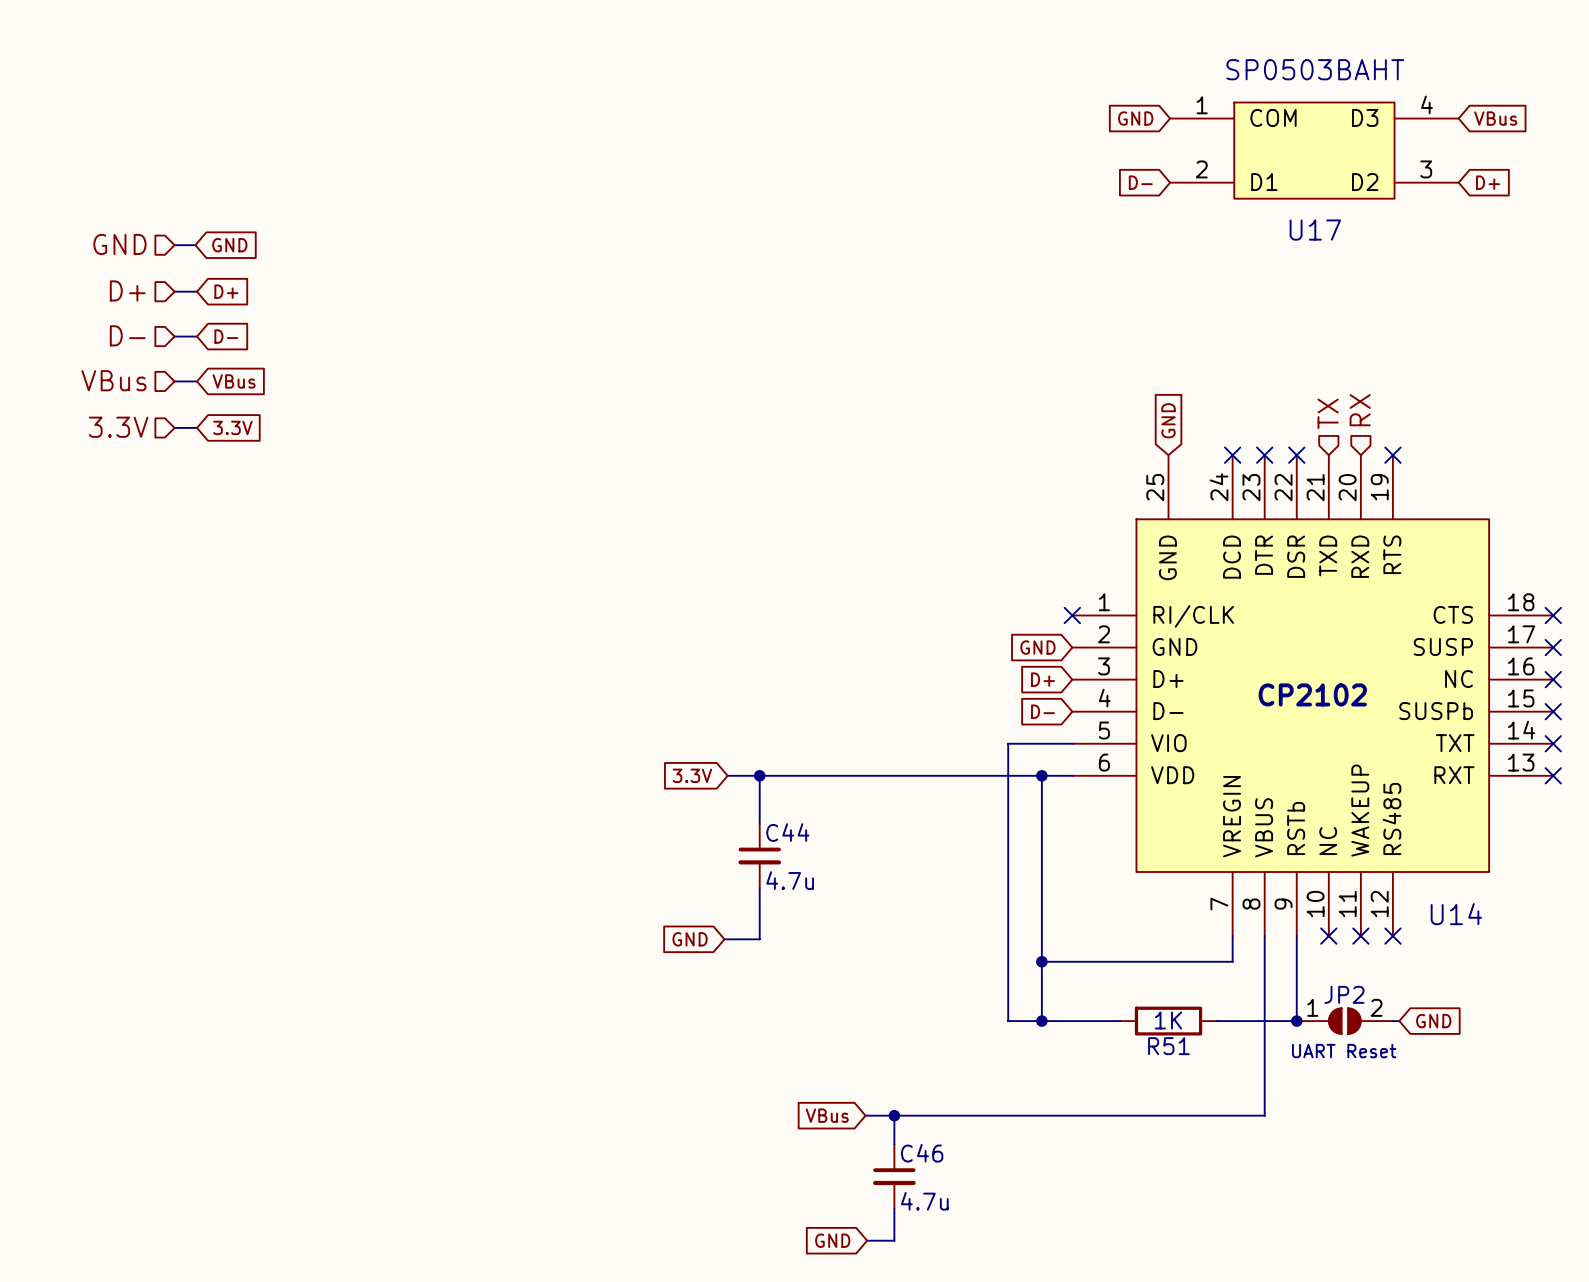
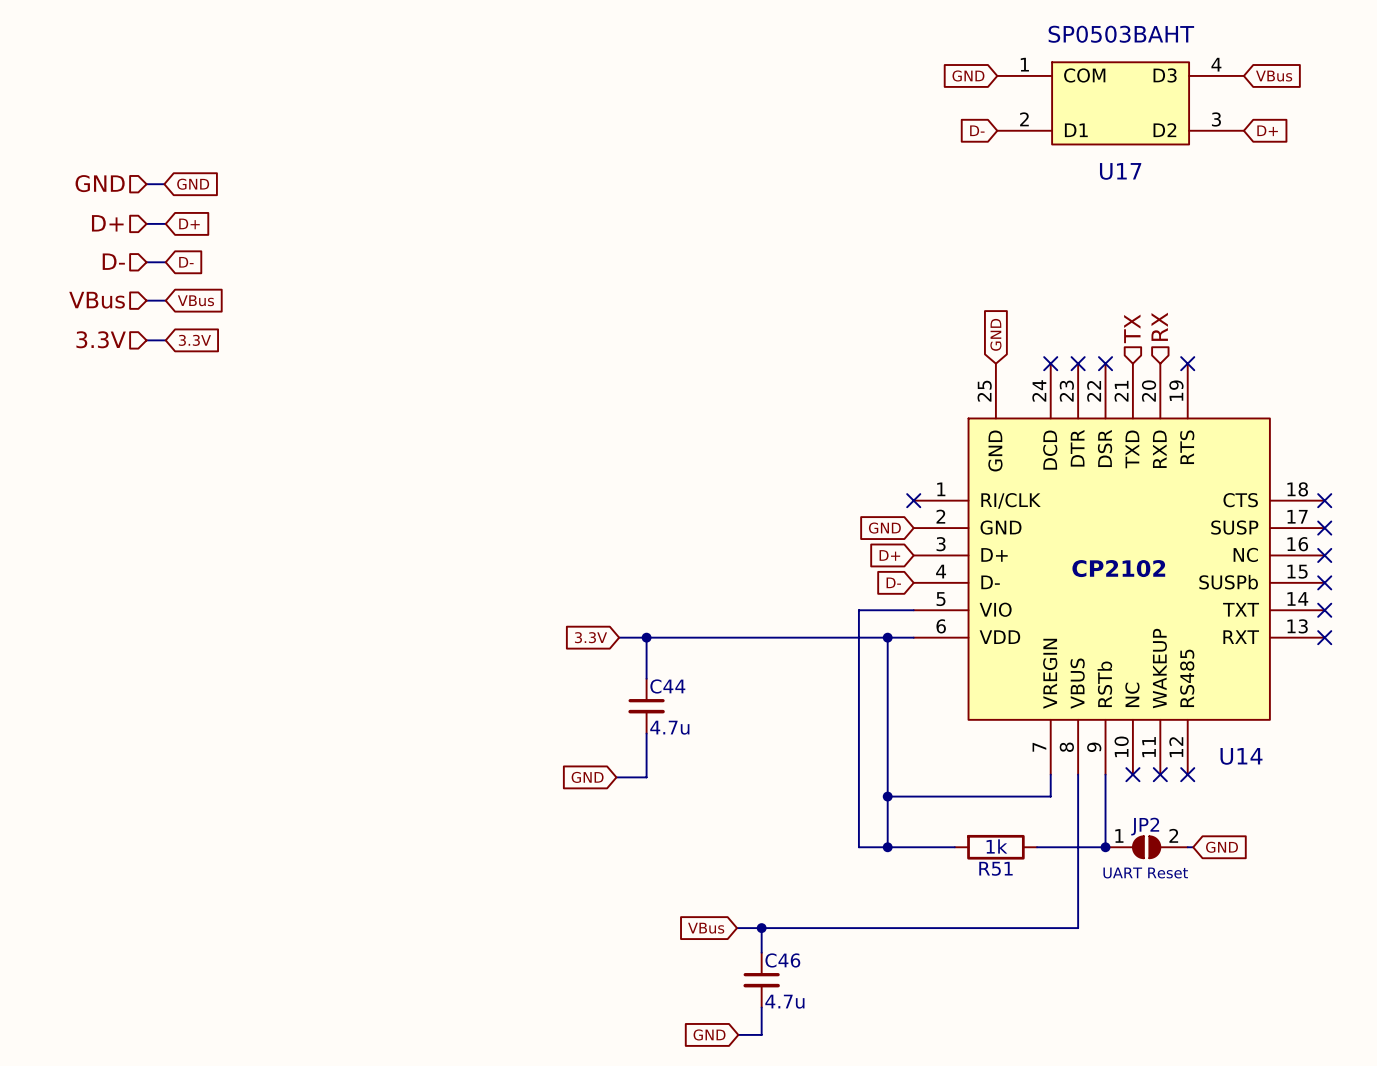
R51 value: 1K (1168, 1020) -> 1k (996, 846)

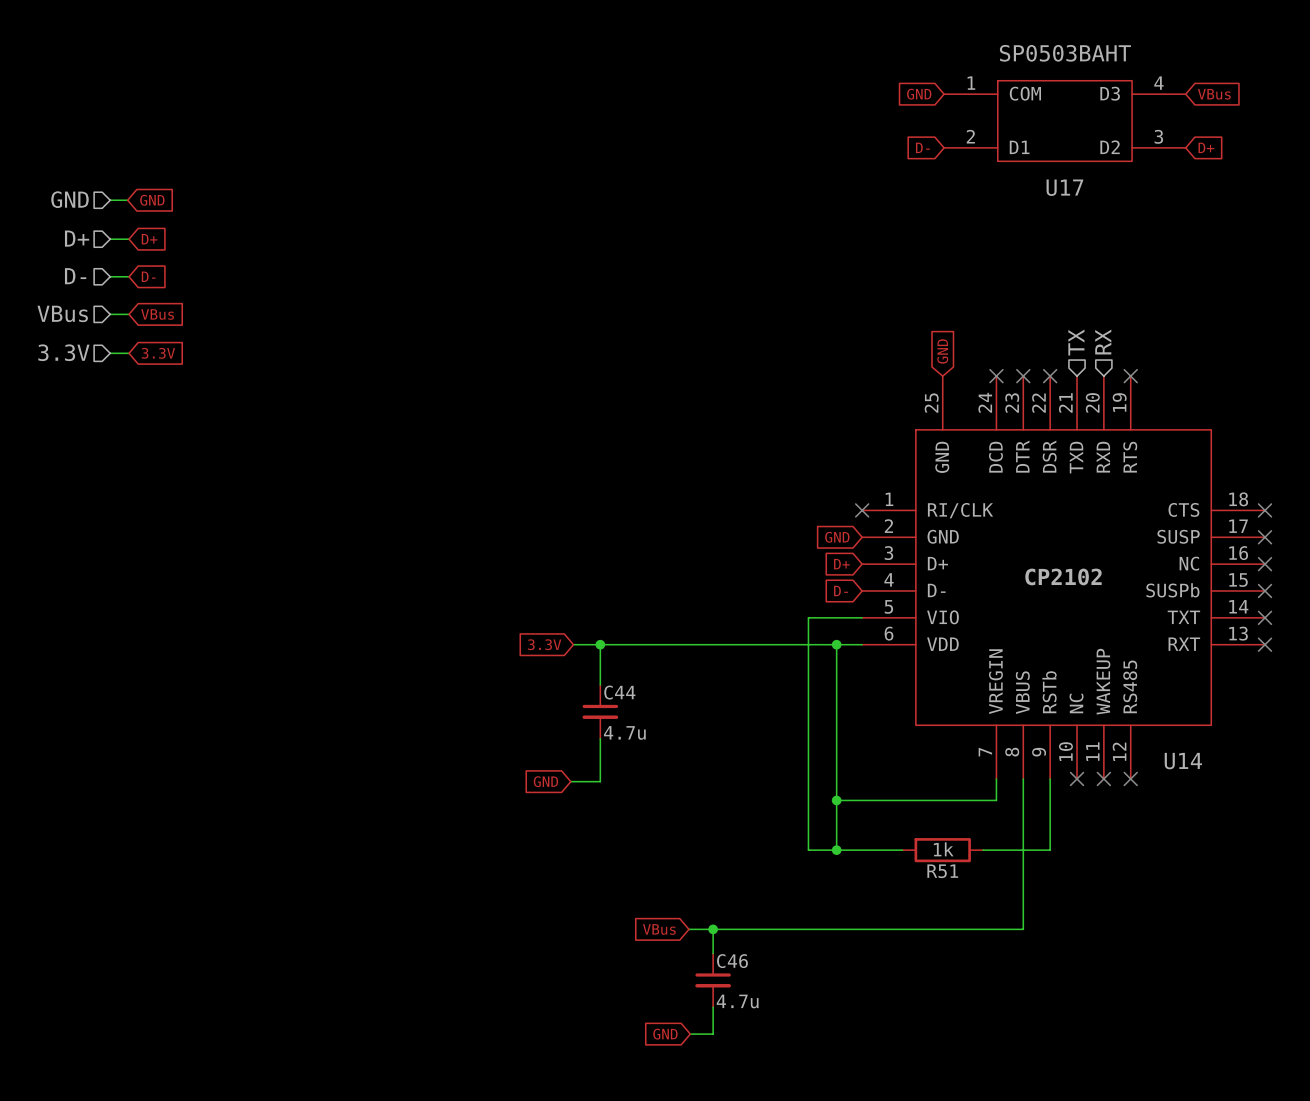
junction: (1105, 847) -> none
JP2: UART Reset (1146, 847) -> none
wire: (1187, 847) (1193, 847) -> none
global label: GND (1222, 847) -> none

